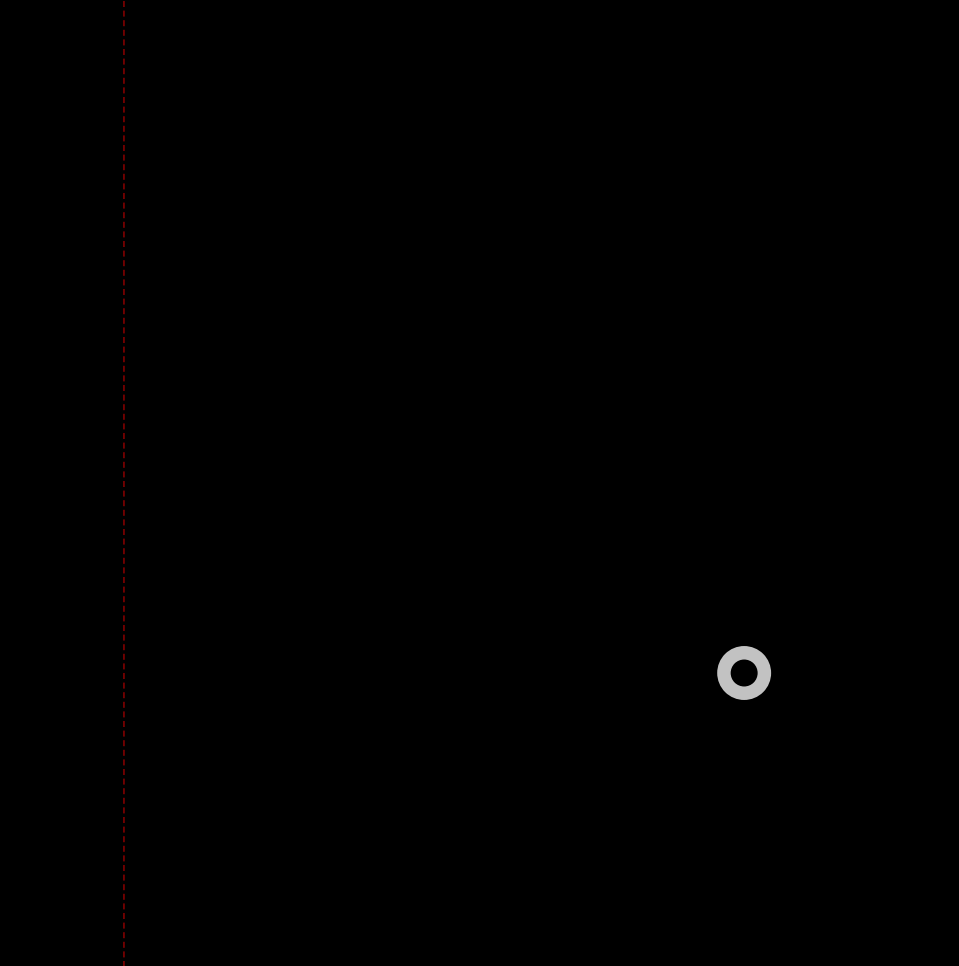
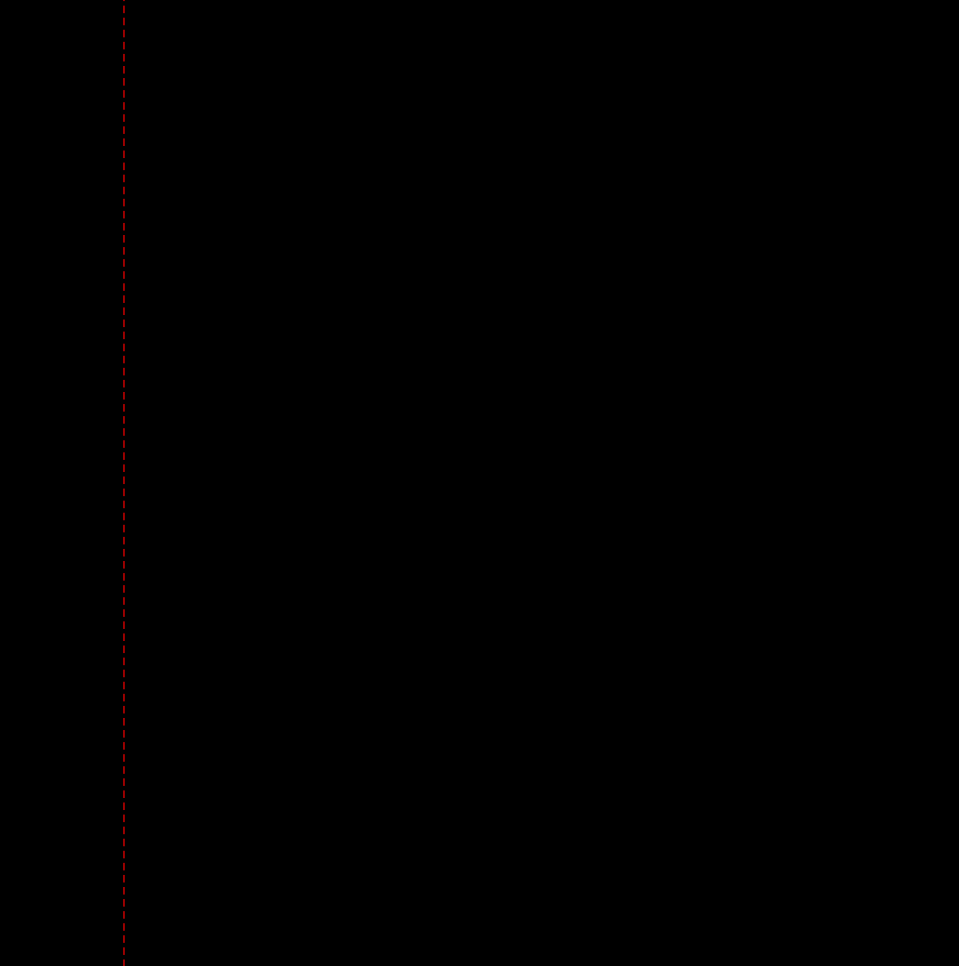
via: (744, 673) -> none

